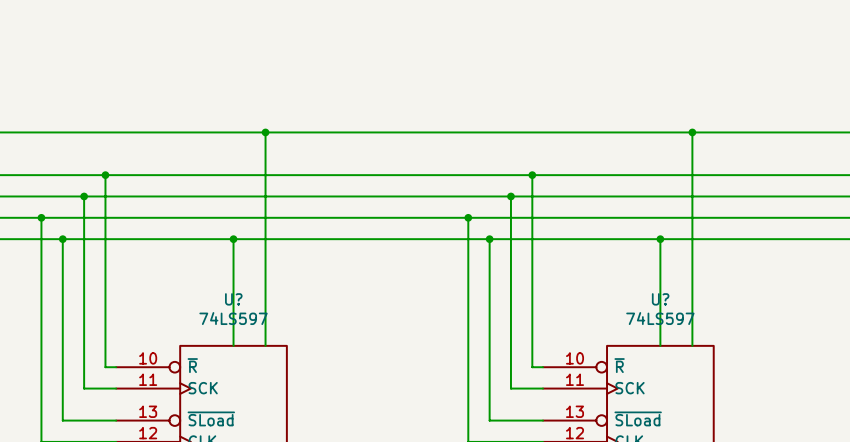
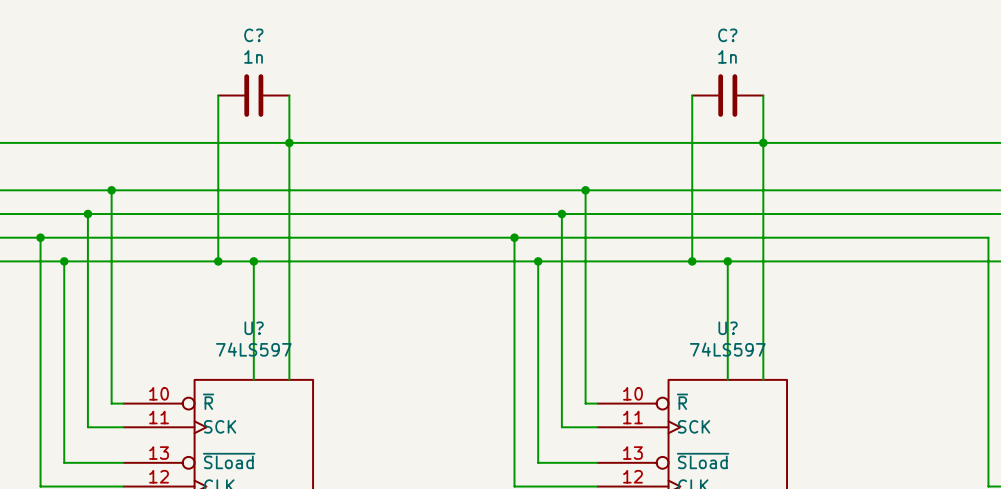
wire: none -> (218, 95) (218, 261)
C?: none -> 1n (253, 95)
wire: none -> (289, 95) (289, 142)
wire: none -> (692, 95) (692, 261)
C?: none -> 1n (727, 95)
wire: none -> (763, 95) (763, 142)
junction: none -> (218, 261)
junction: none -> (692, 261)

